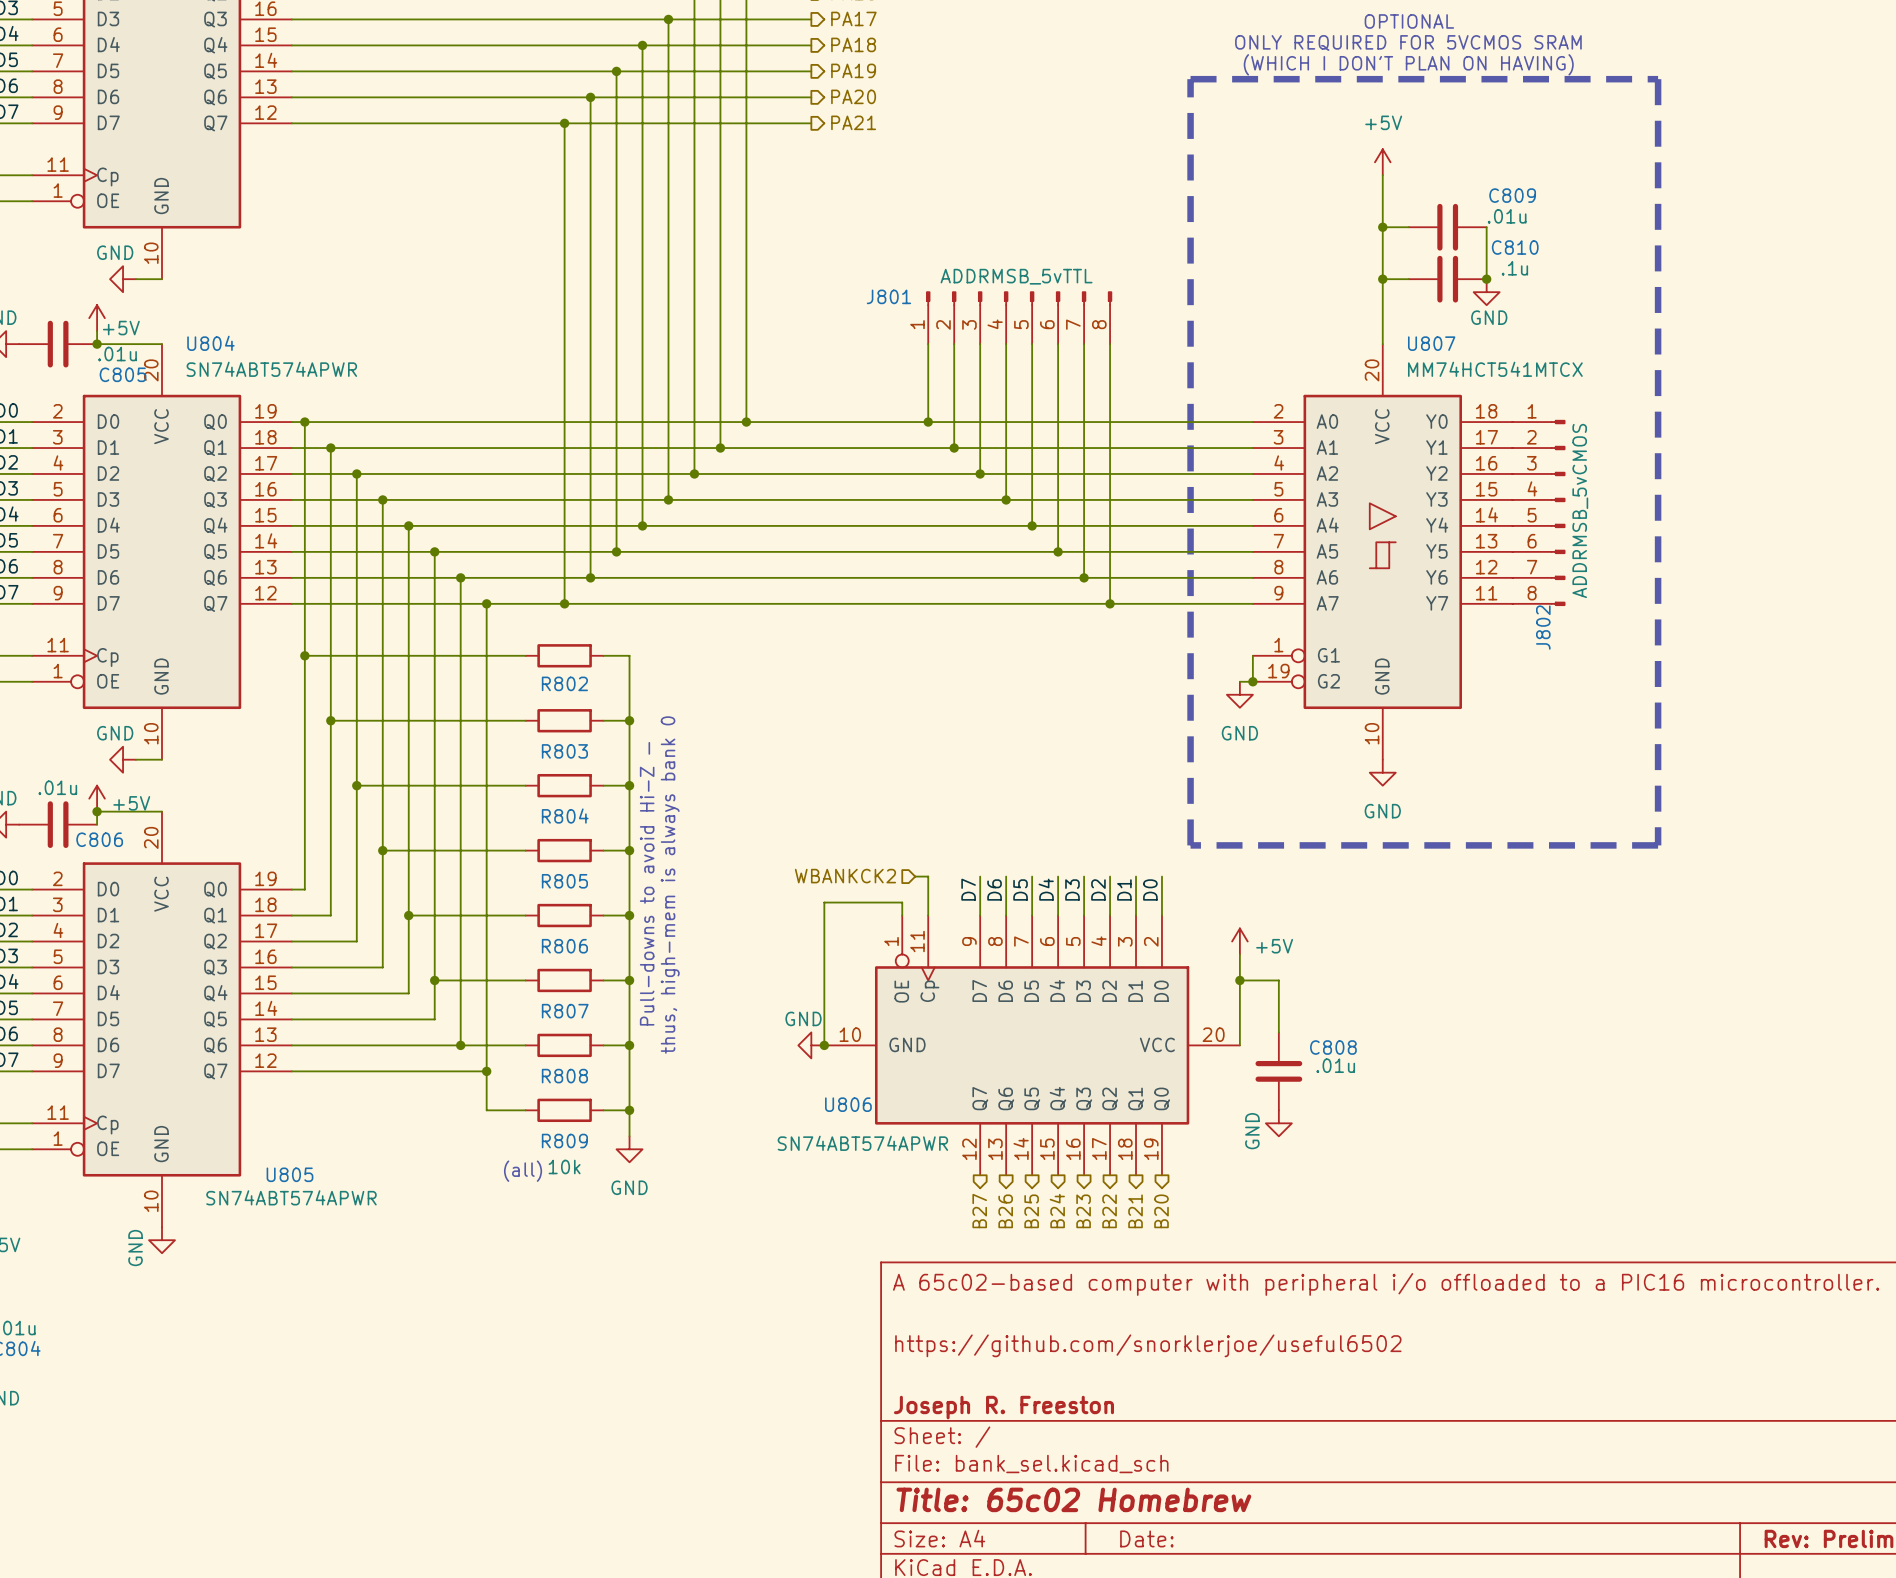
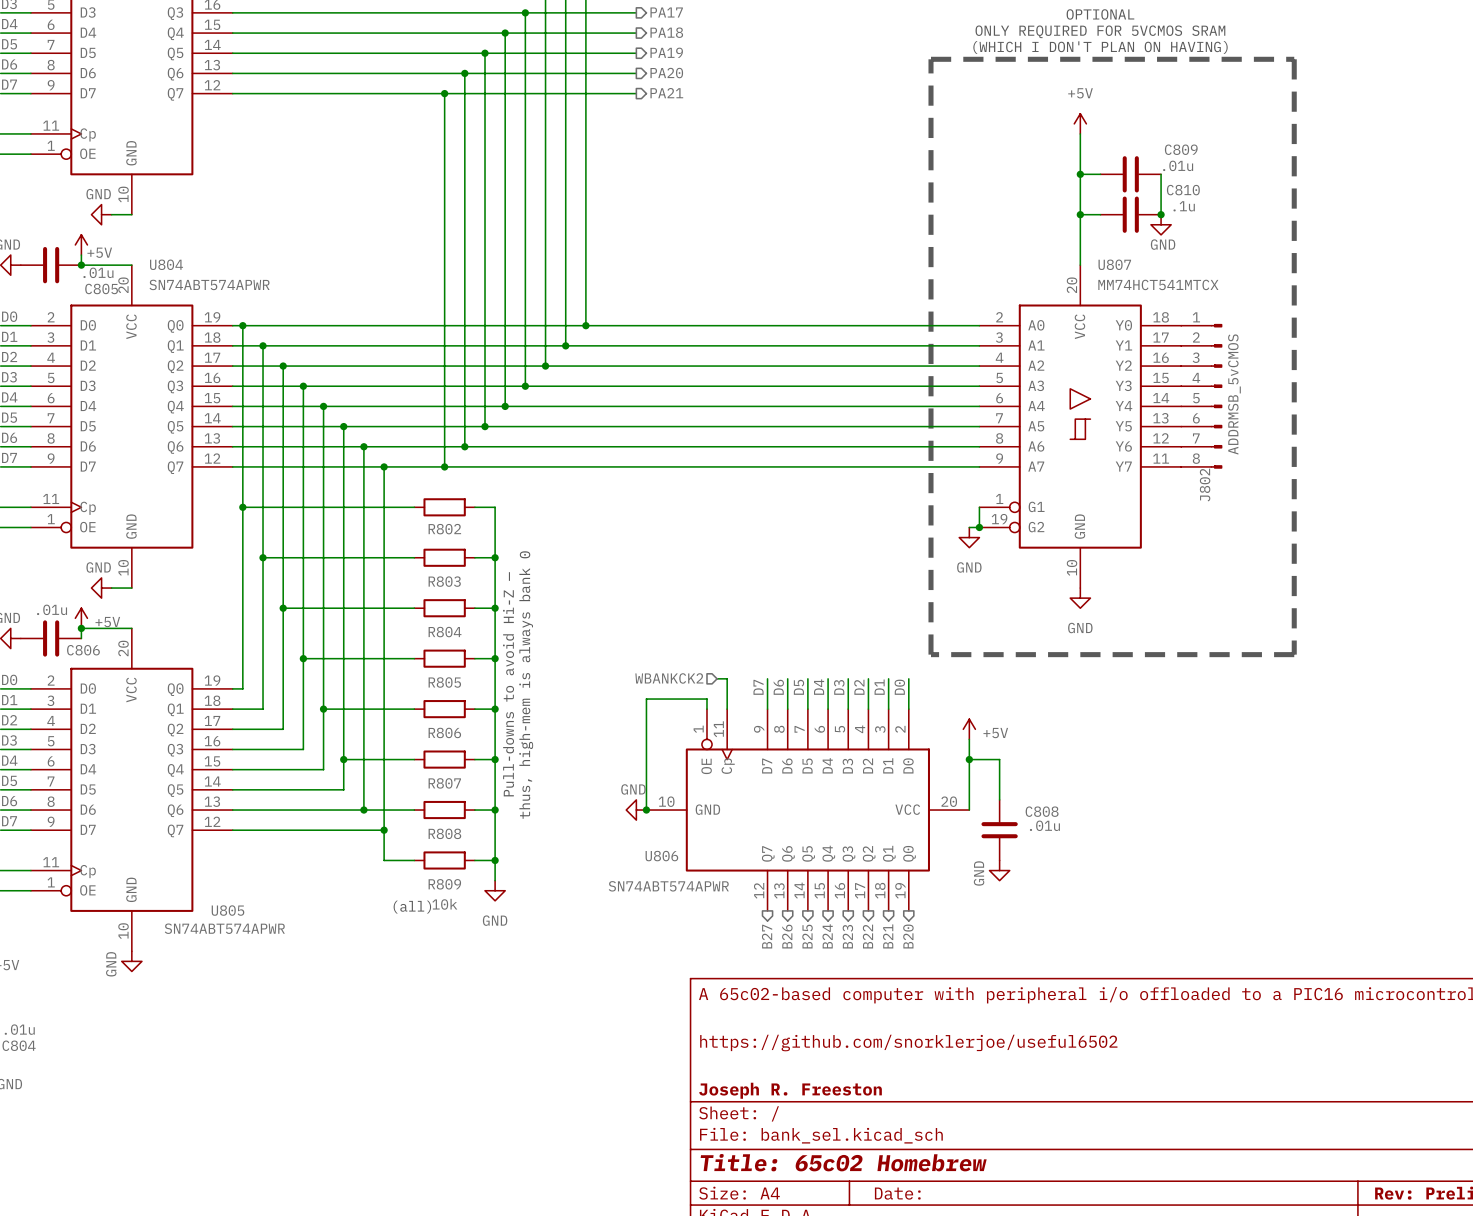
J801: ADDRMSB_5vTTL (1019, 317) -> none
wire: (928, 344) (928, 422) -> none
wire: (954, 344) (954, 448) -> none
wire: (980, 344) (980, 473) -> none
wire: (1006, 344) (1006, 499) -> none
wire: (1032, 344) (1032, 525) -> none
wire: (1058, 344) (1058, 551) -> none
wire: (1084, 344) (1084, 577) -> none
wire: (1110, 344) (1110, 603) -> none
junction: (928, 422) -> none
junction: (954, 448) -> none
junction: (980, 473) -> none
junction: (1006, 499) -> none
junction: (1032, 525) -> none
junction: (1058, 551) -> none
junction: (1084, 577) -> none
junction: (1110, 603) -> none

